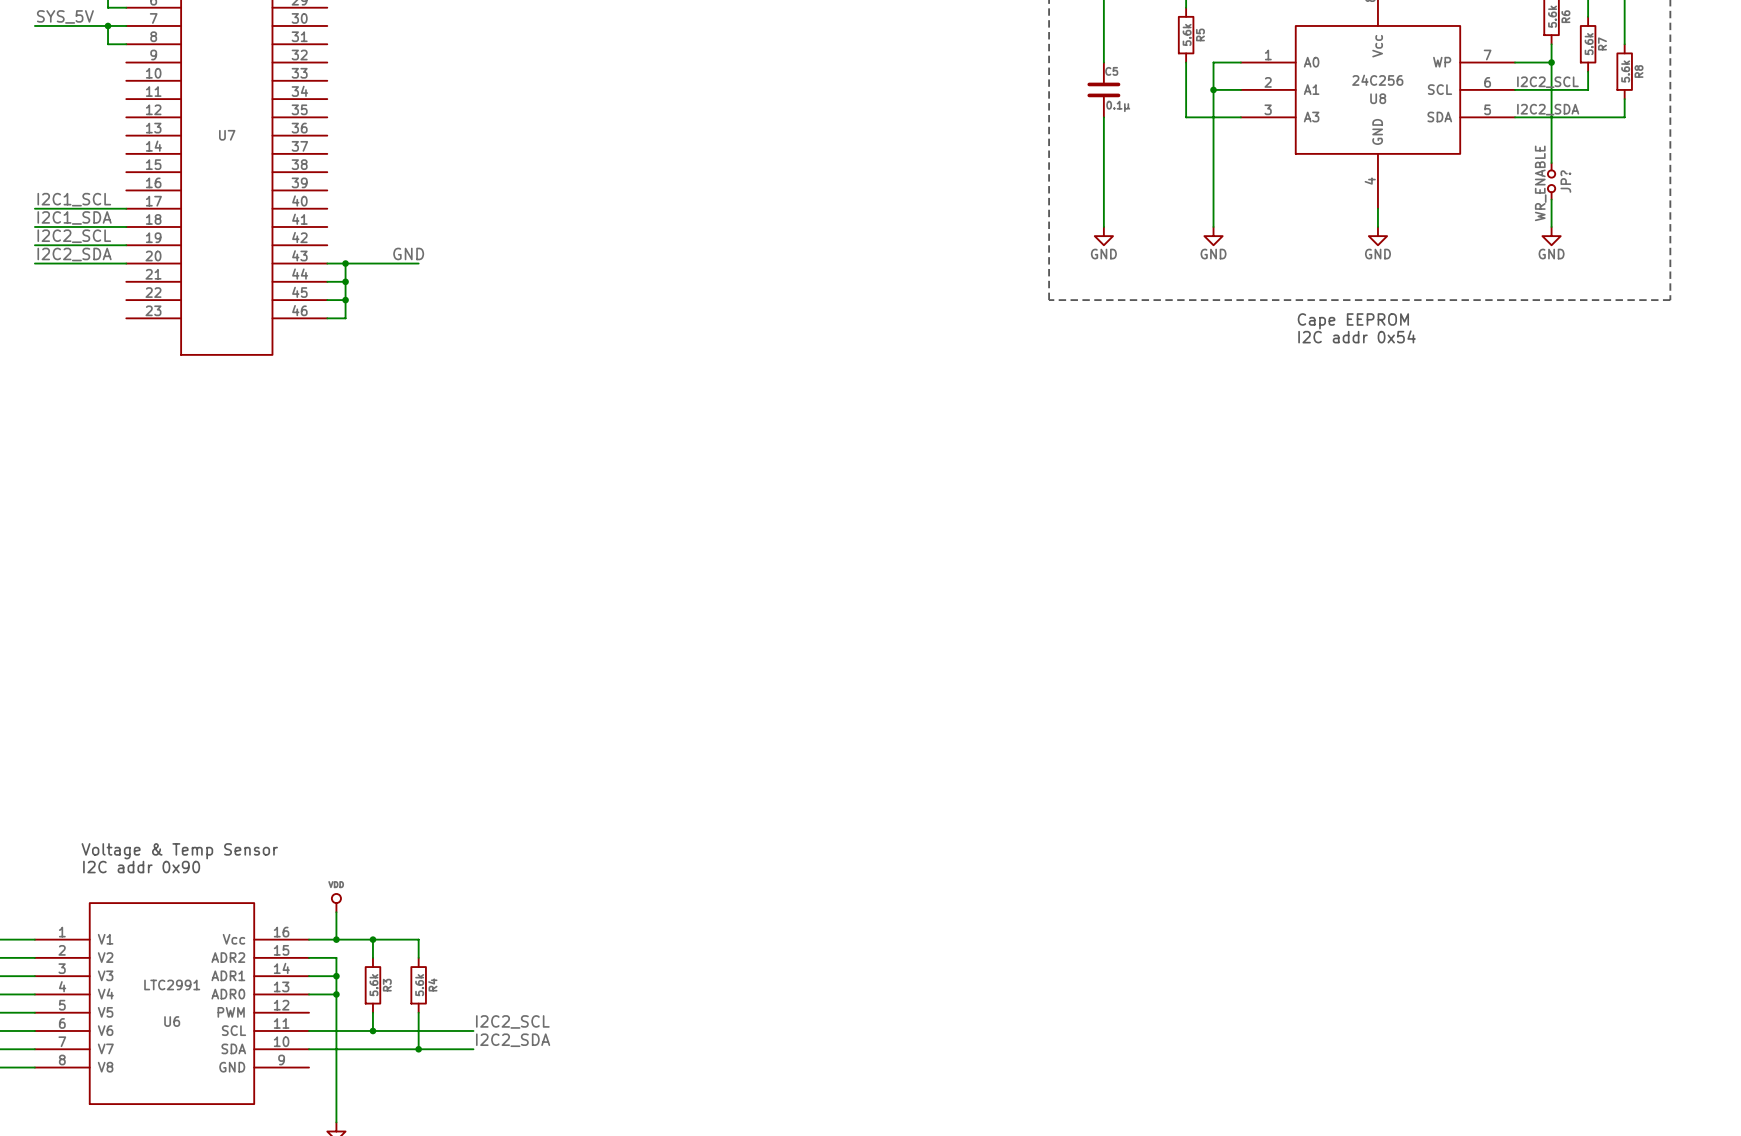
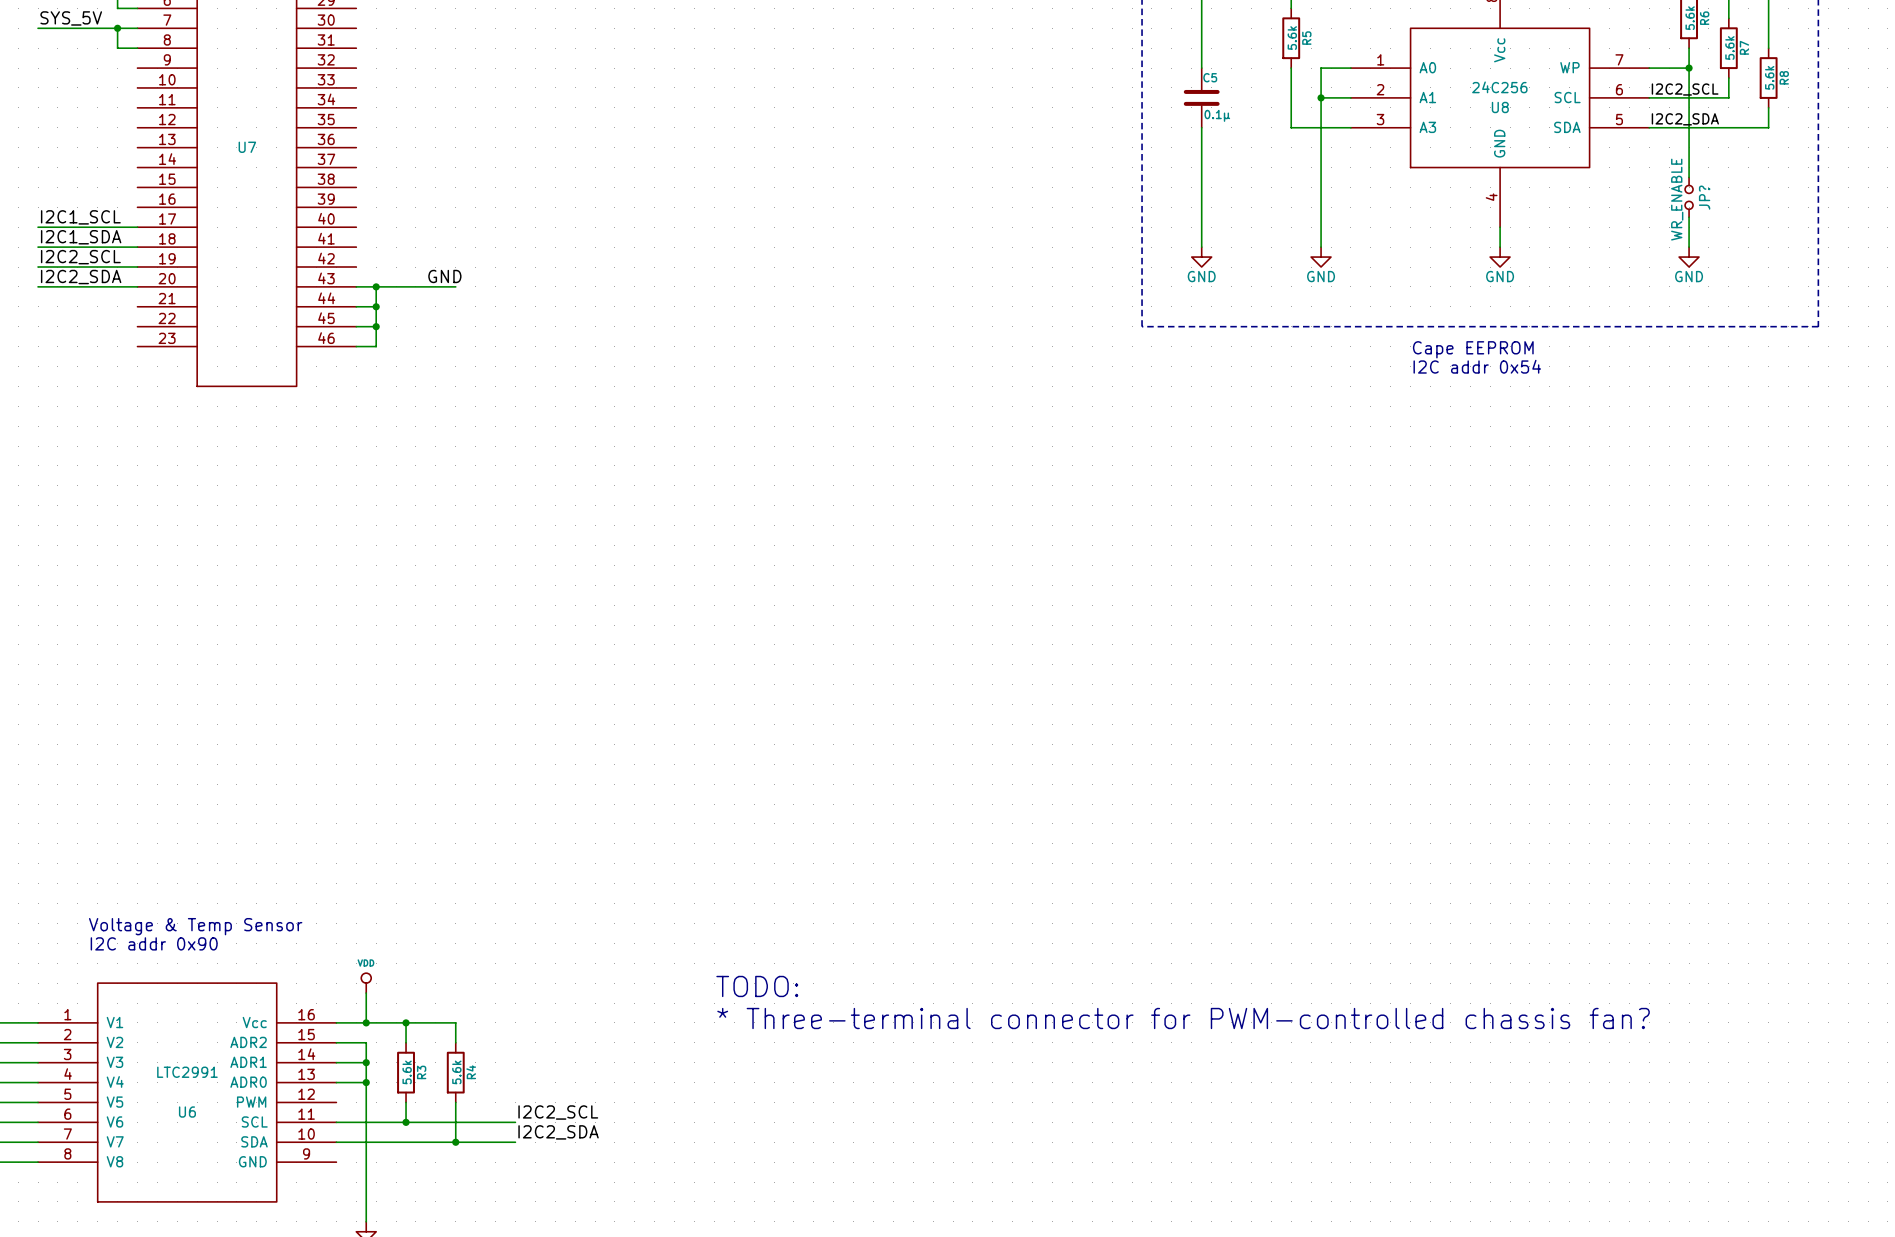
text: none -> TODO: (757, 986)
text: none -> * Three-terminal connector for PWM-controlled chassis fan? (1183, 1018)

